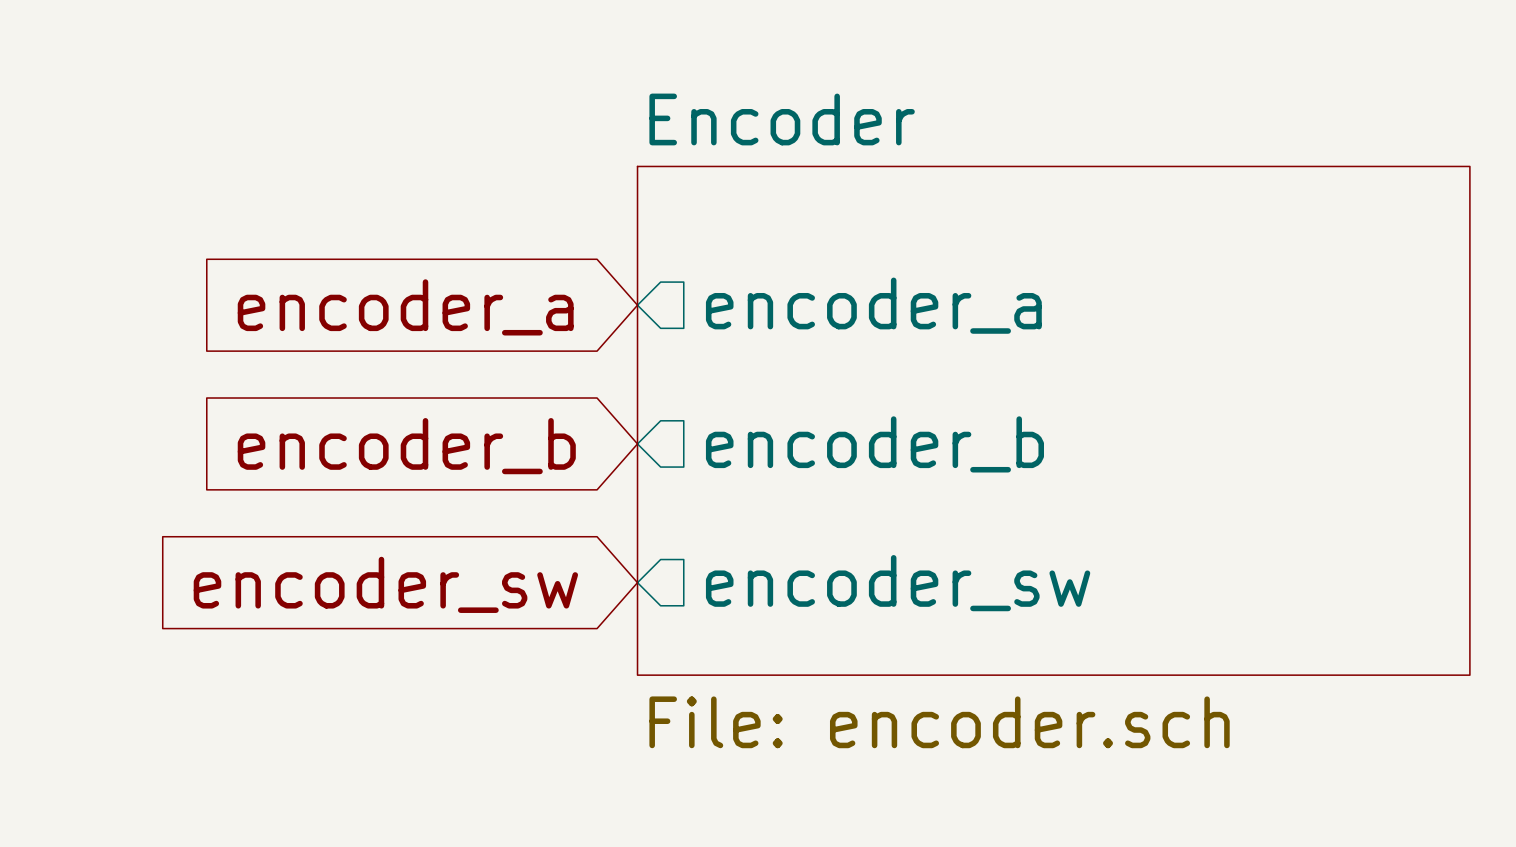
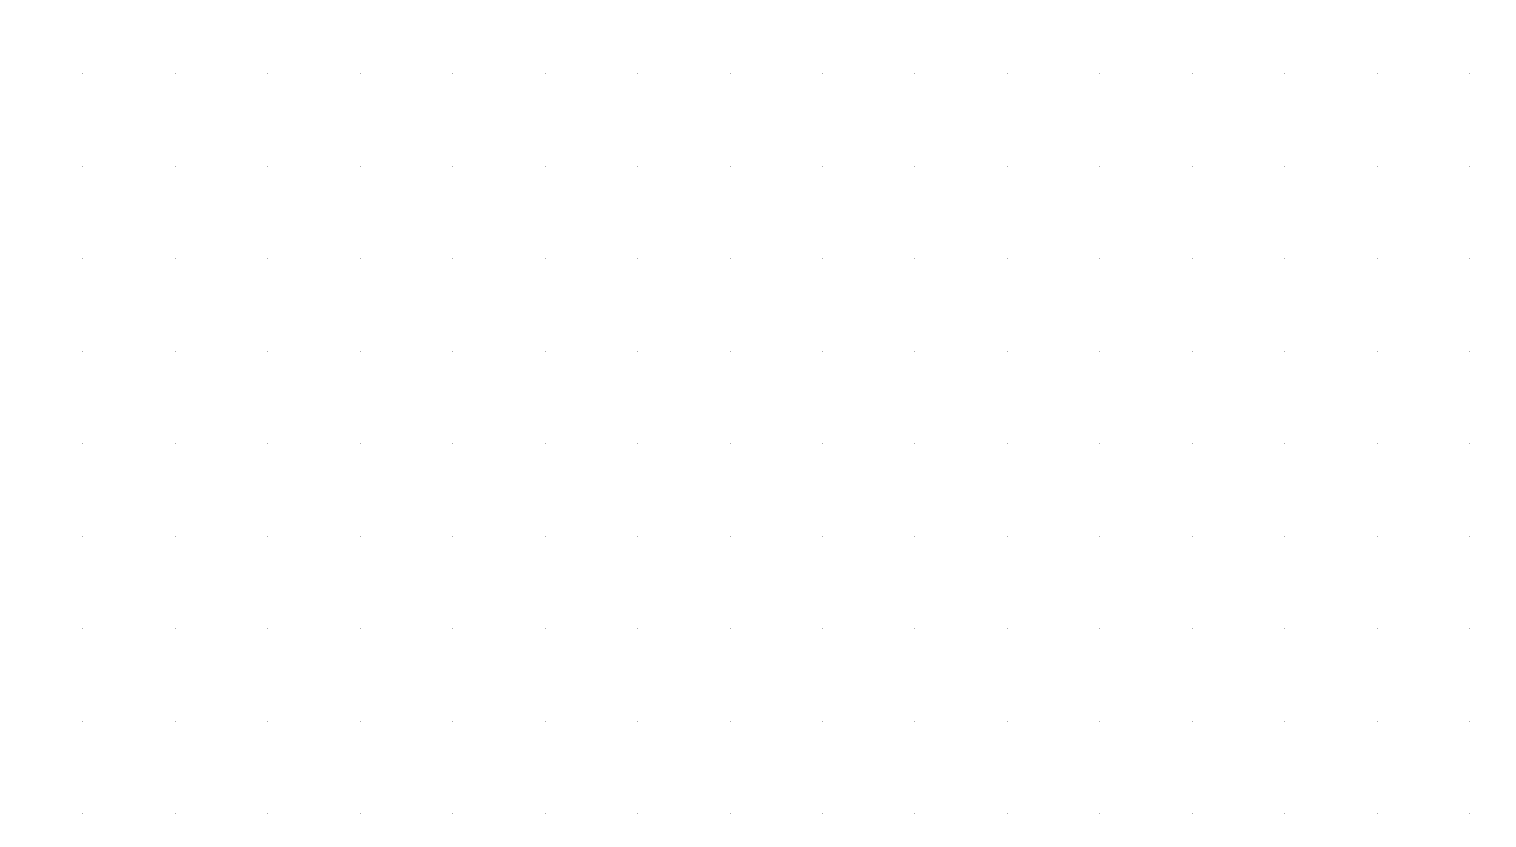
sheet pin: encoder_a (873, 305) -> none
global label: encoder_a (405, 307) -> none
sheet Encoder: File: encoder.sch (1053, 420) -> none
sheet pin: encoder_b (874, 444) -> none
global label: encoder_b (406, 446) -> none
sheet pin: encoder_sw (898, 583) -> none
global label: encoder_sw (385, 584) -> none

